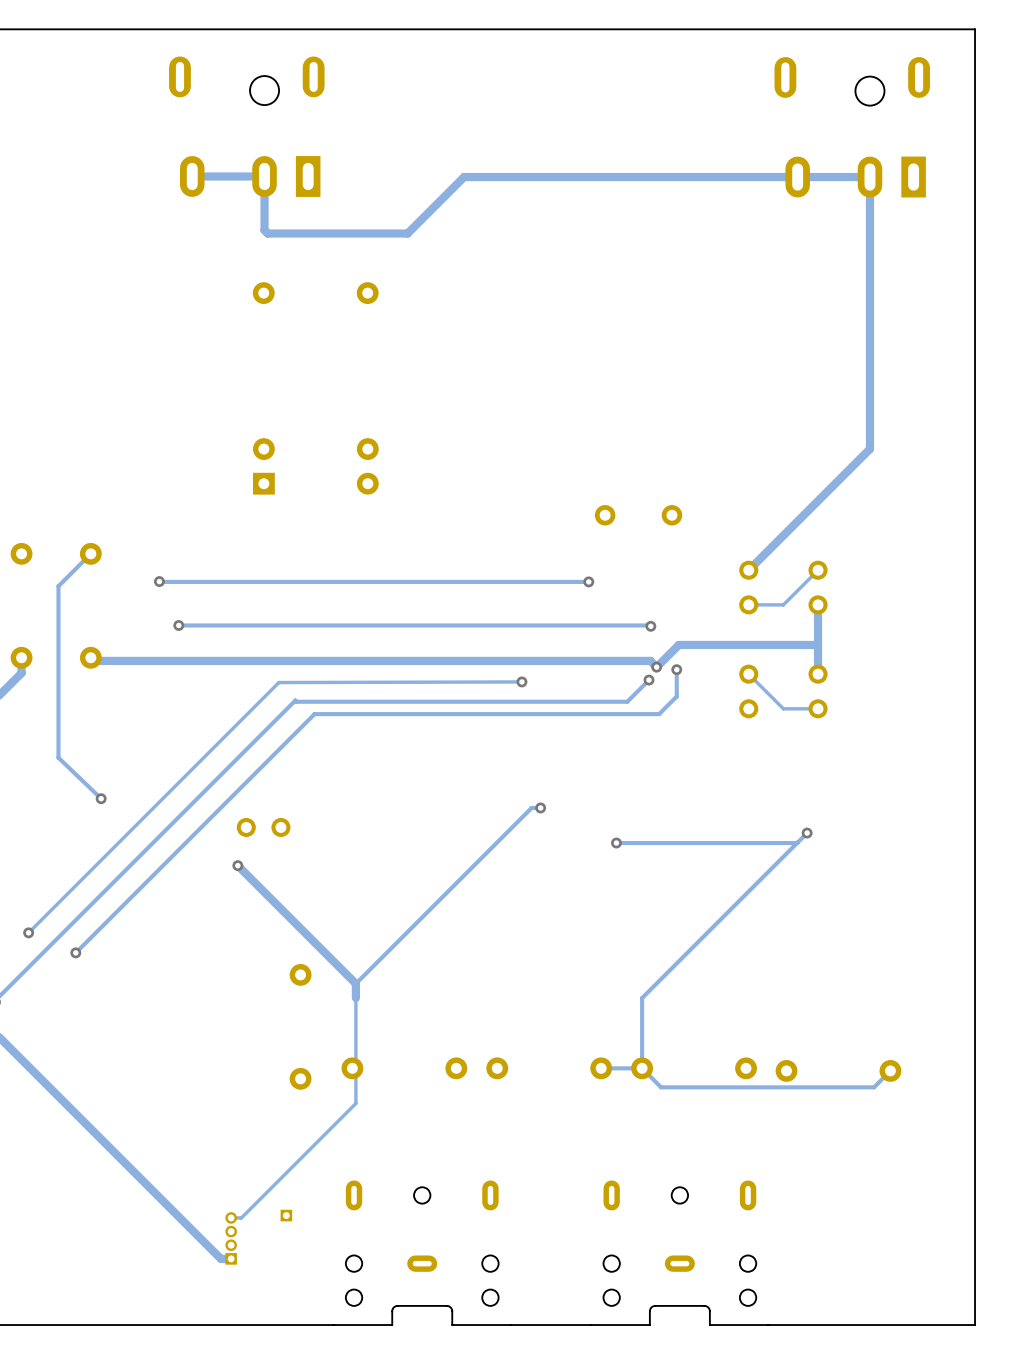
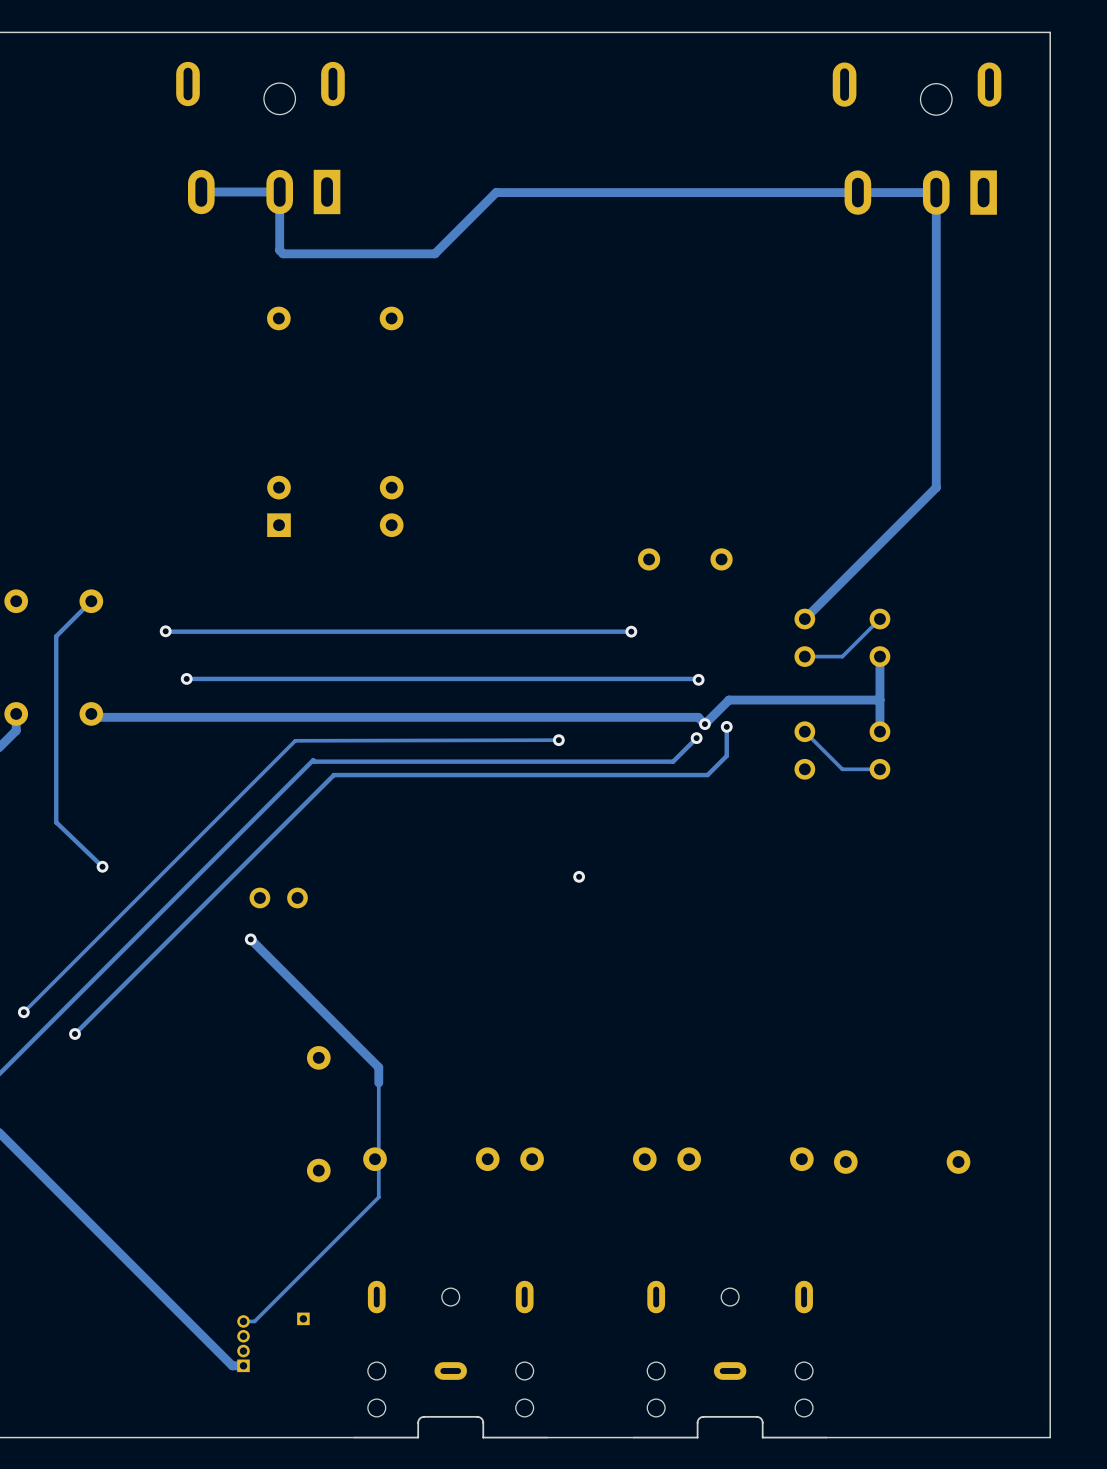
track: (540, 807) (531, 807) (355, 983) -> none
track: (807, 833) (642, 998) (642, 1068) -> none
via: (807, 833) -> none
via: (616, 843) -> none
track: (797, 843) (616, 843) -> none
track: (642, 1068) (601, 1068) -> none
track: (642, 1068) (661, 1087) (874, 1087) (890, 1070) -> none

